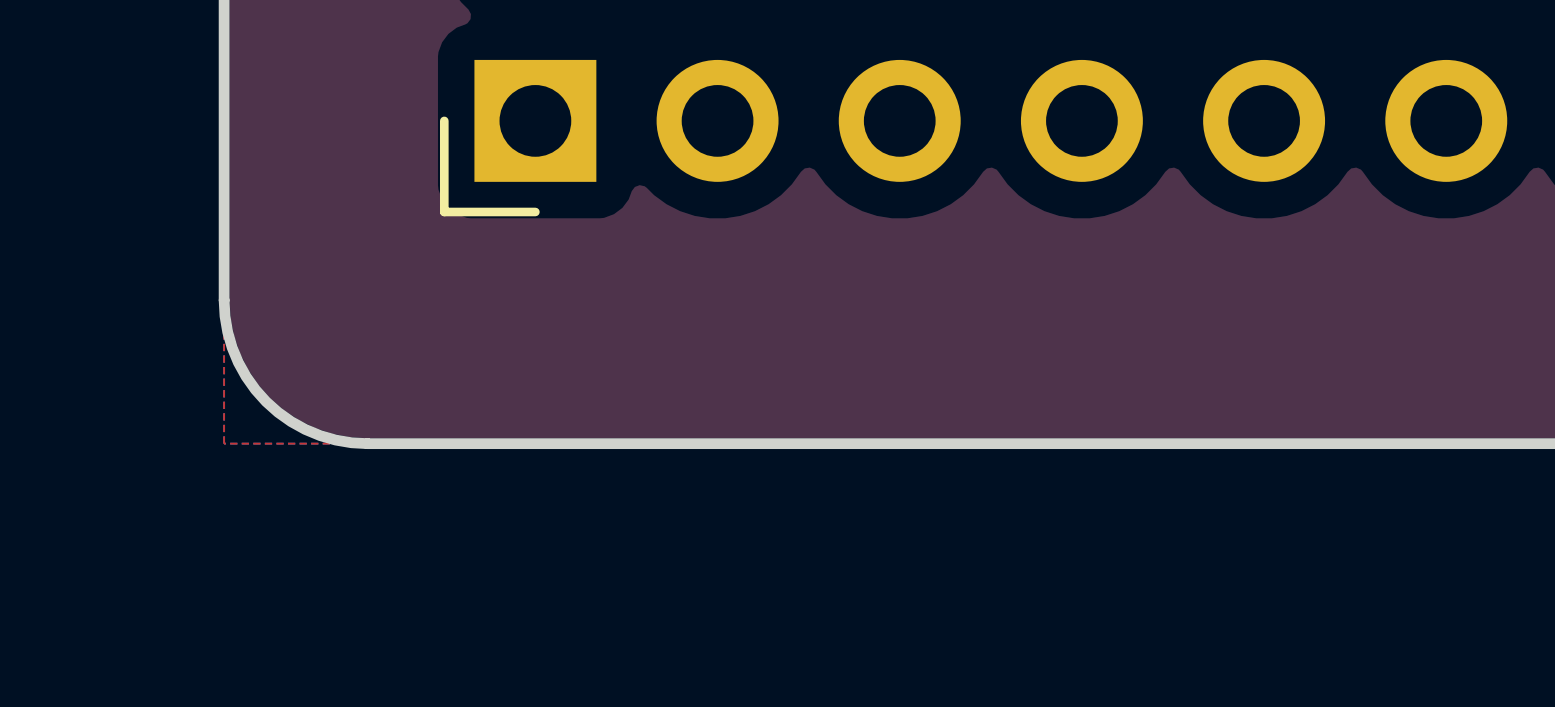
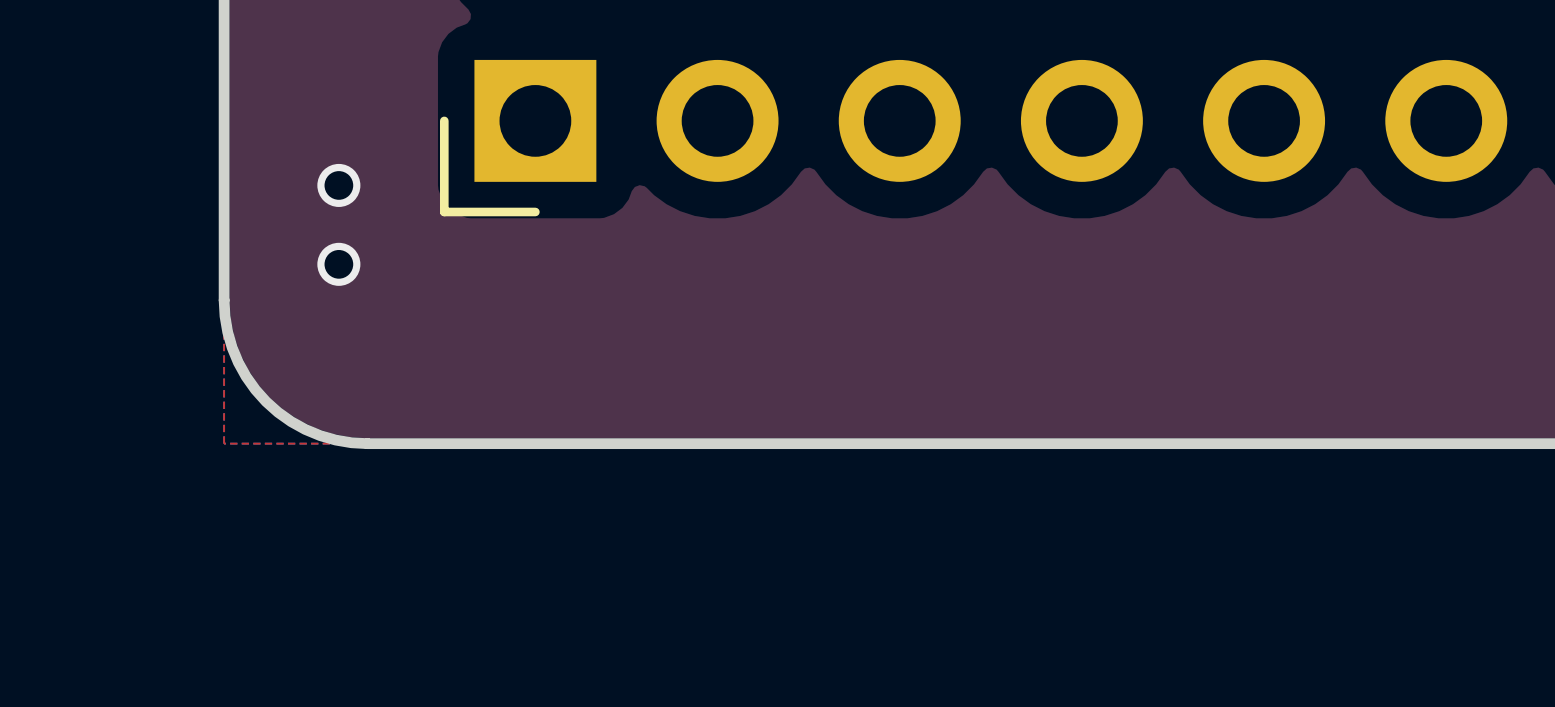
via: none -> (338, 185)
via: none -> (338, 264)

